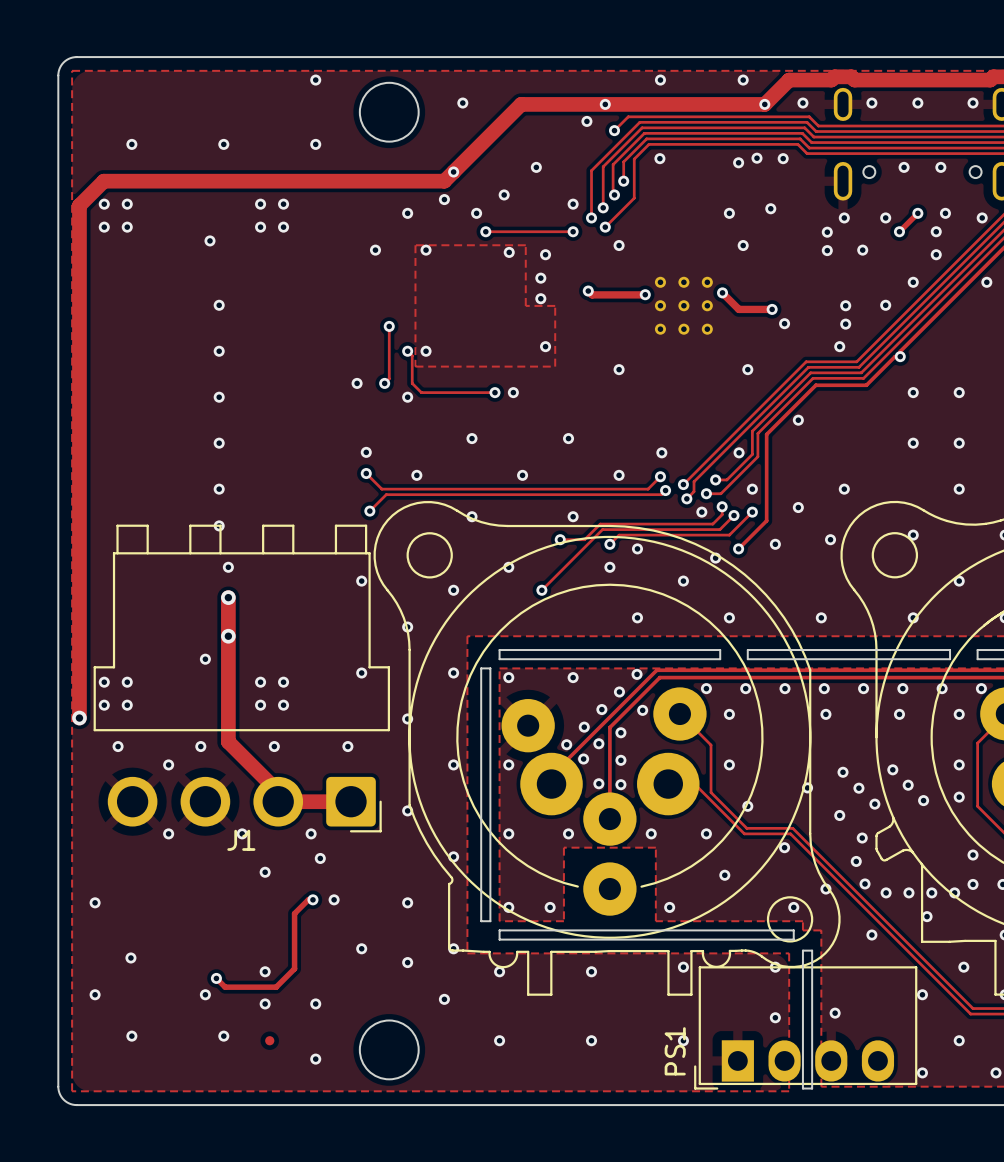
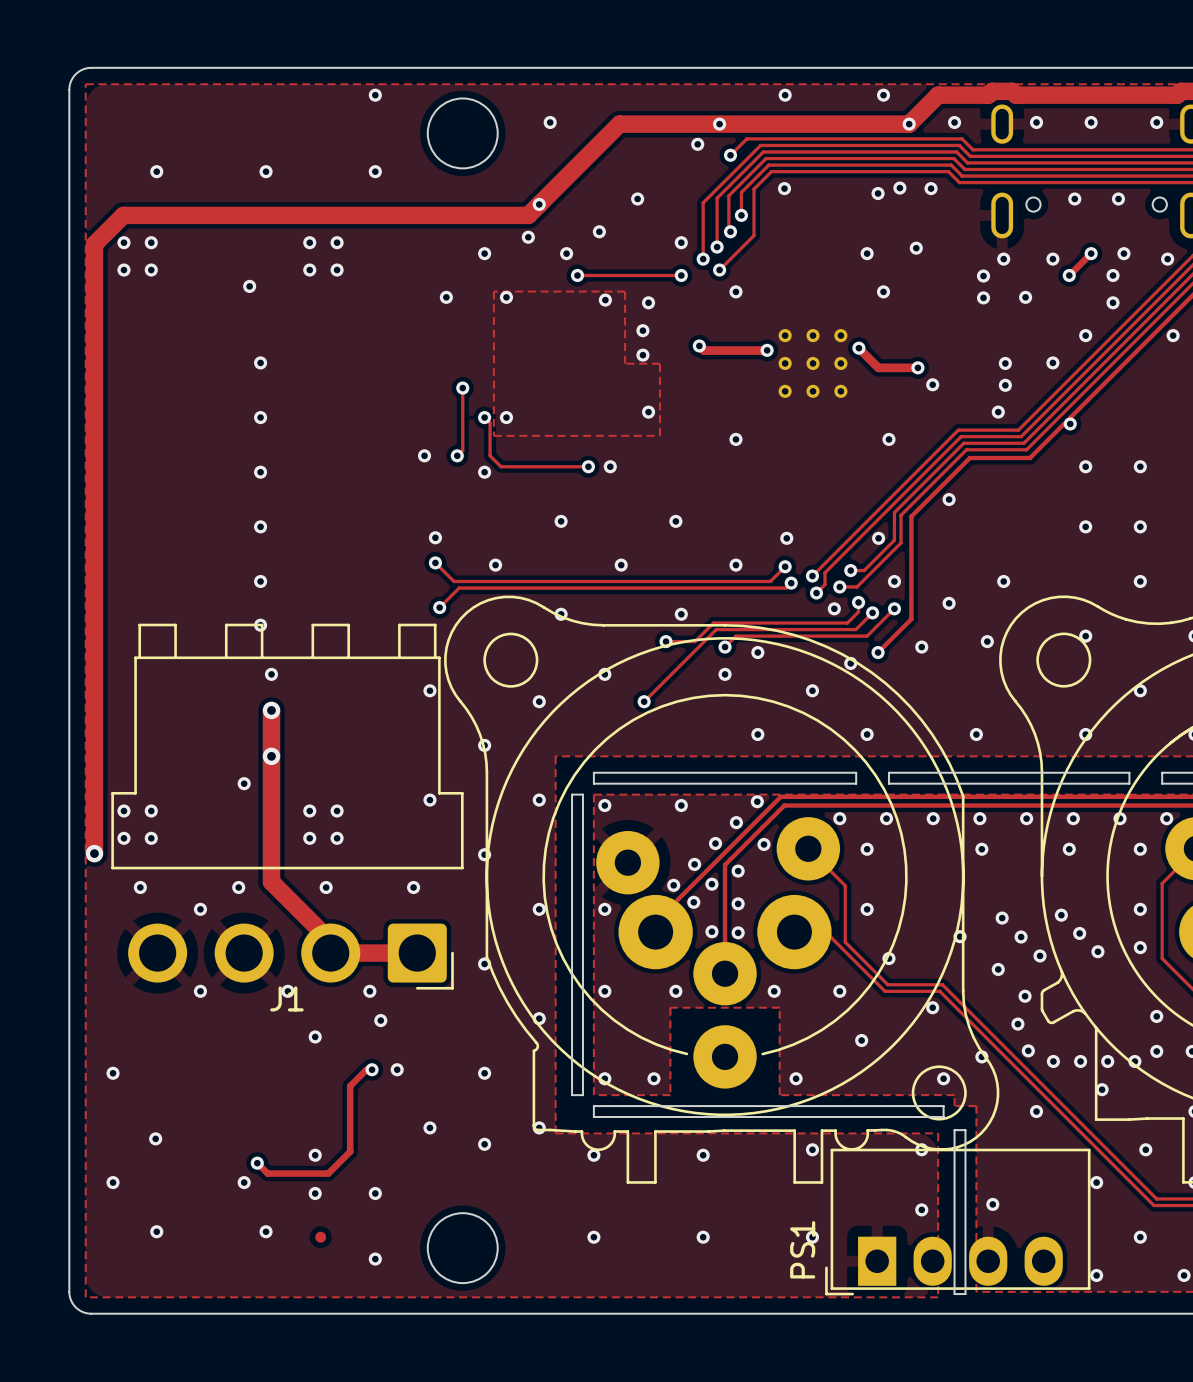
via: (444, 999) -> none

